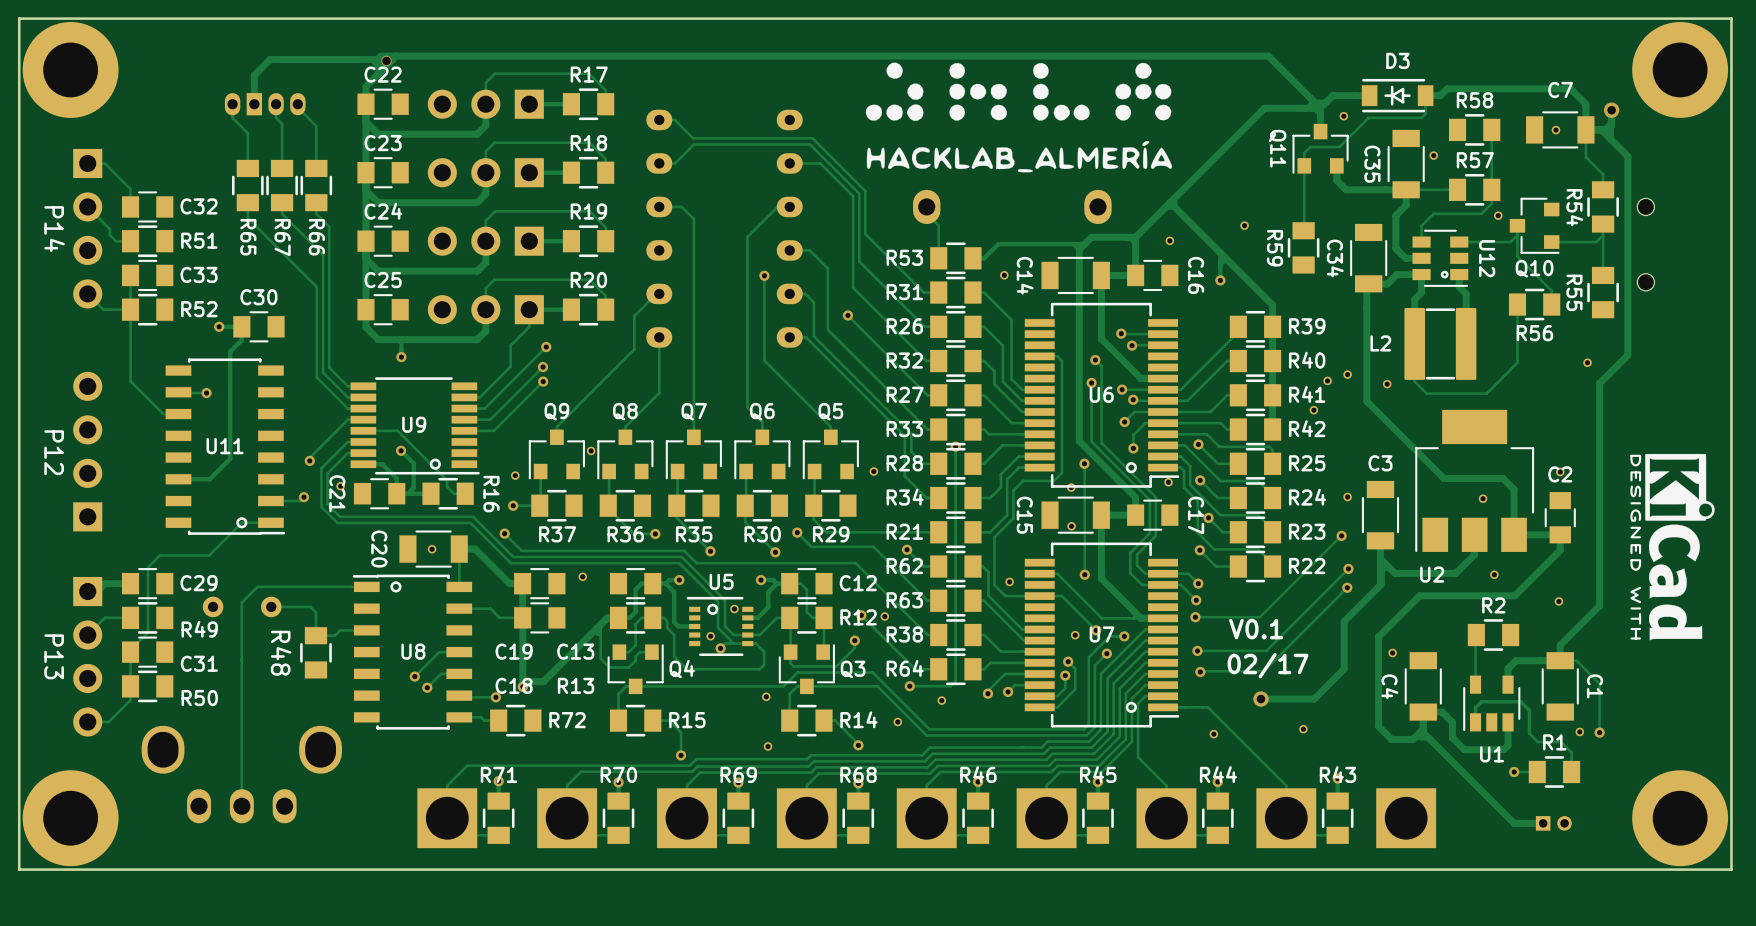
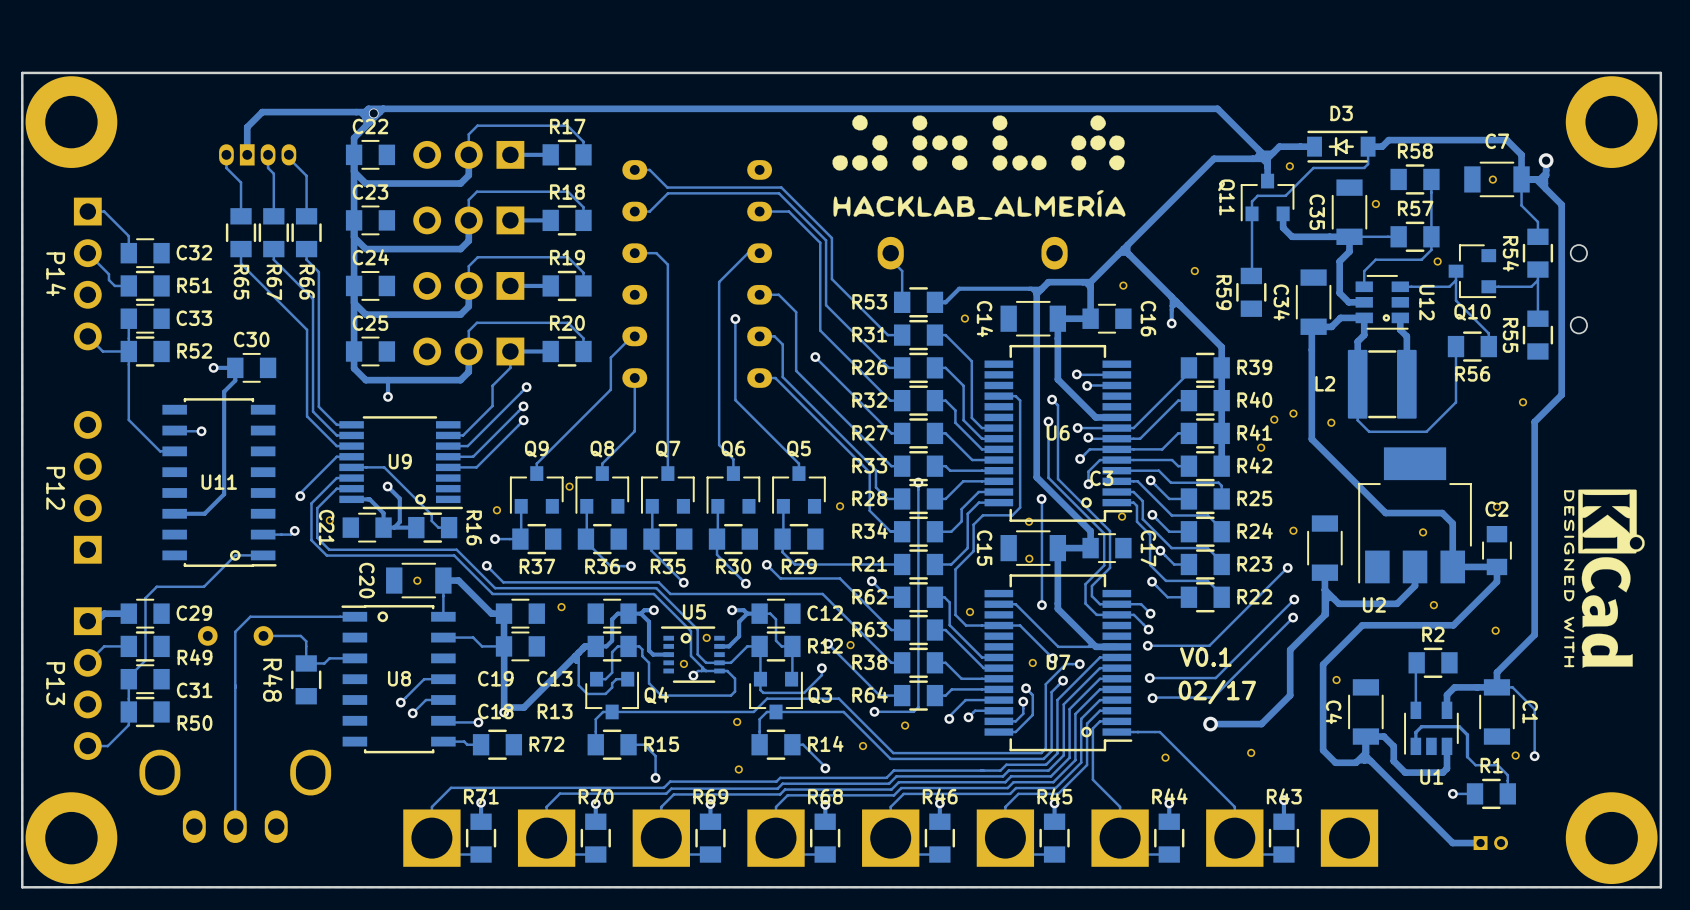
C3 name position: C3 (1380, 463) -> C3 (1101, 478)

